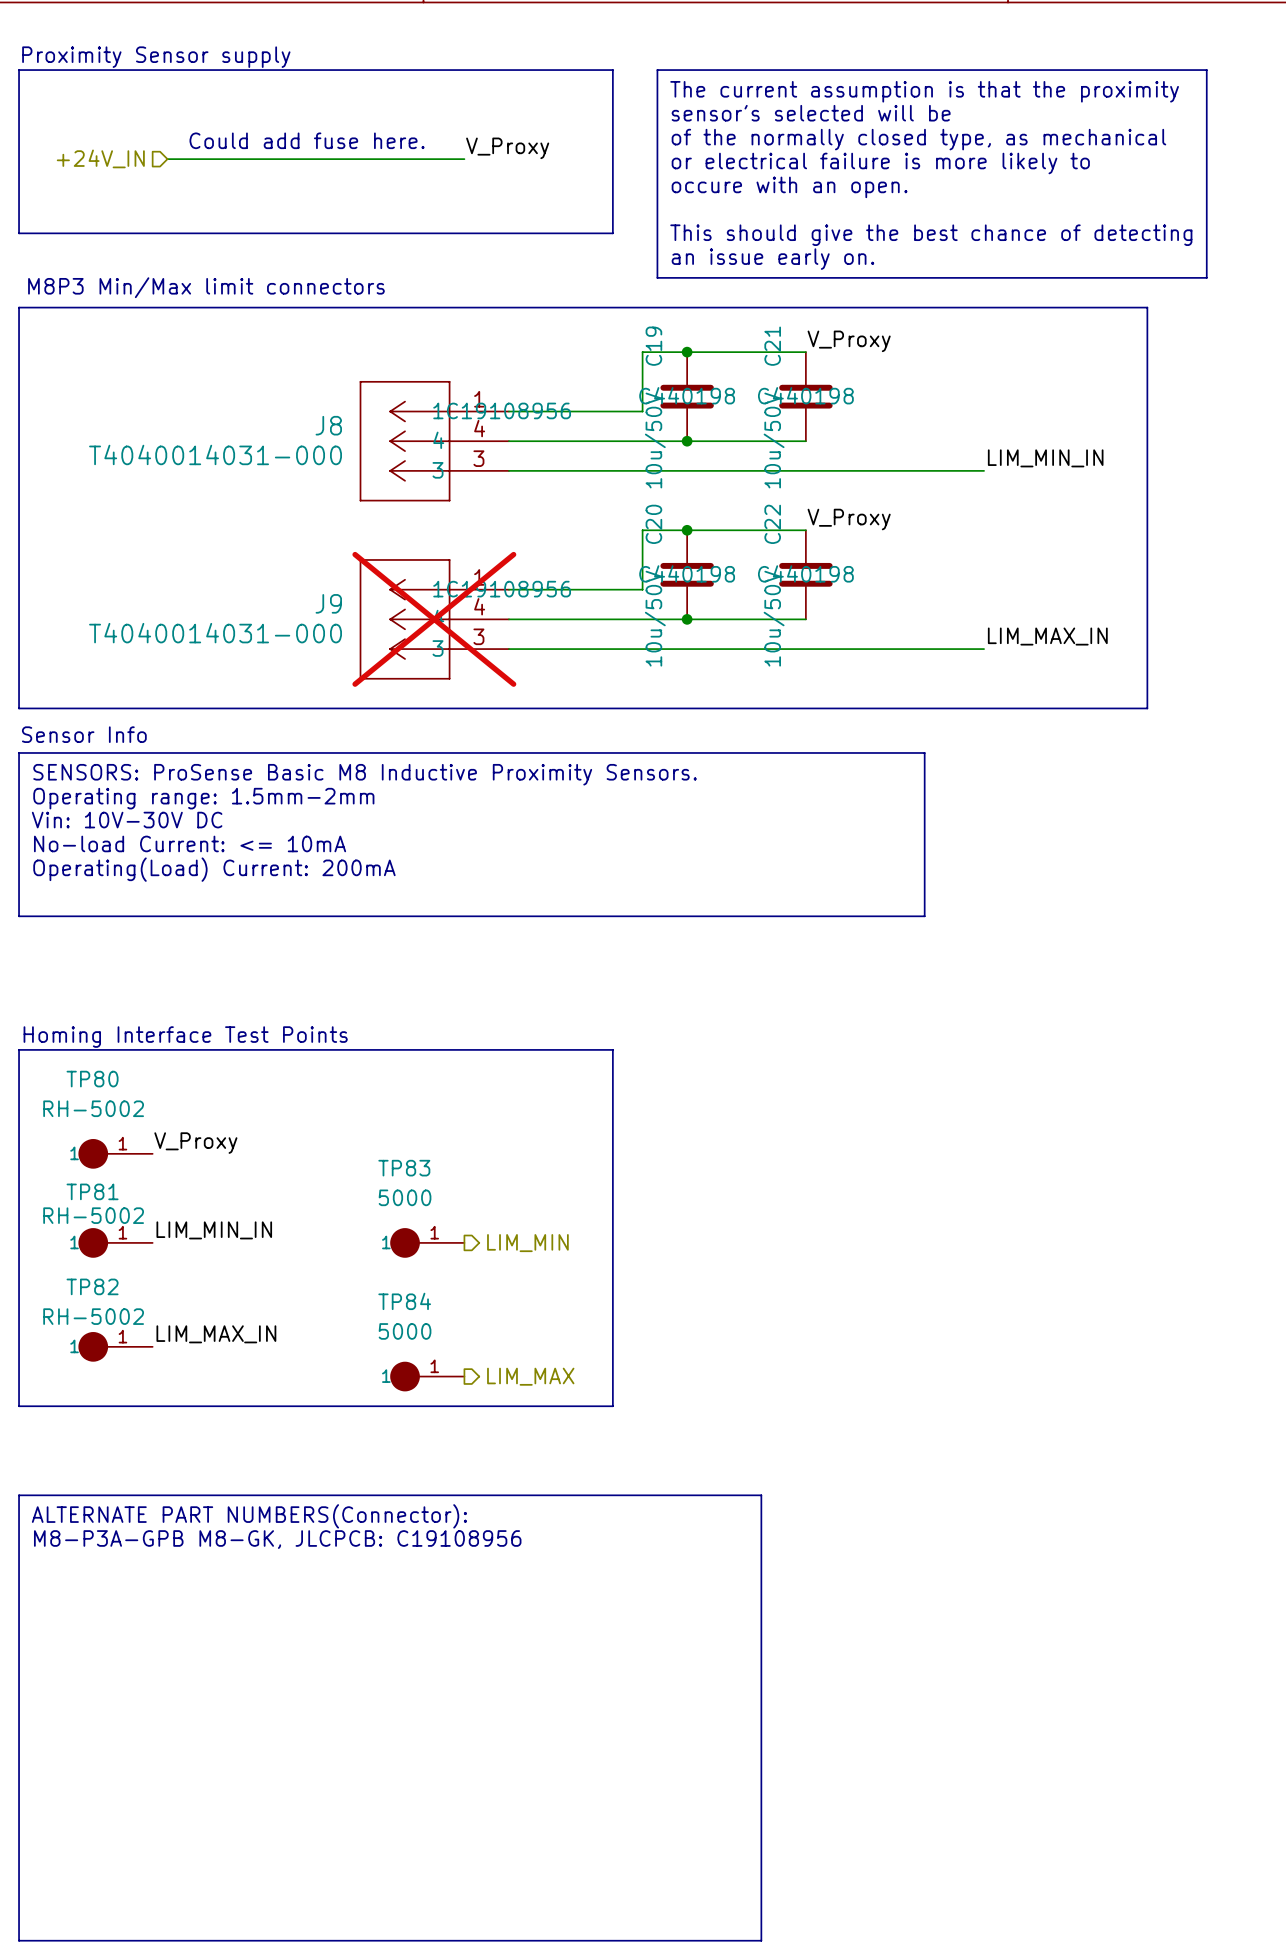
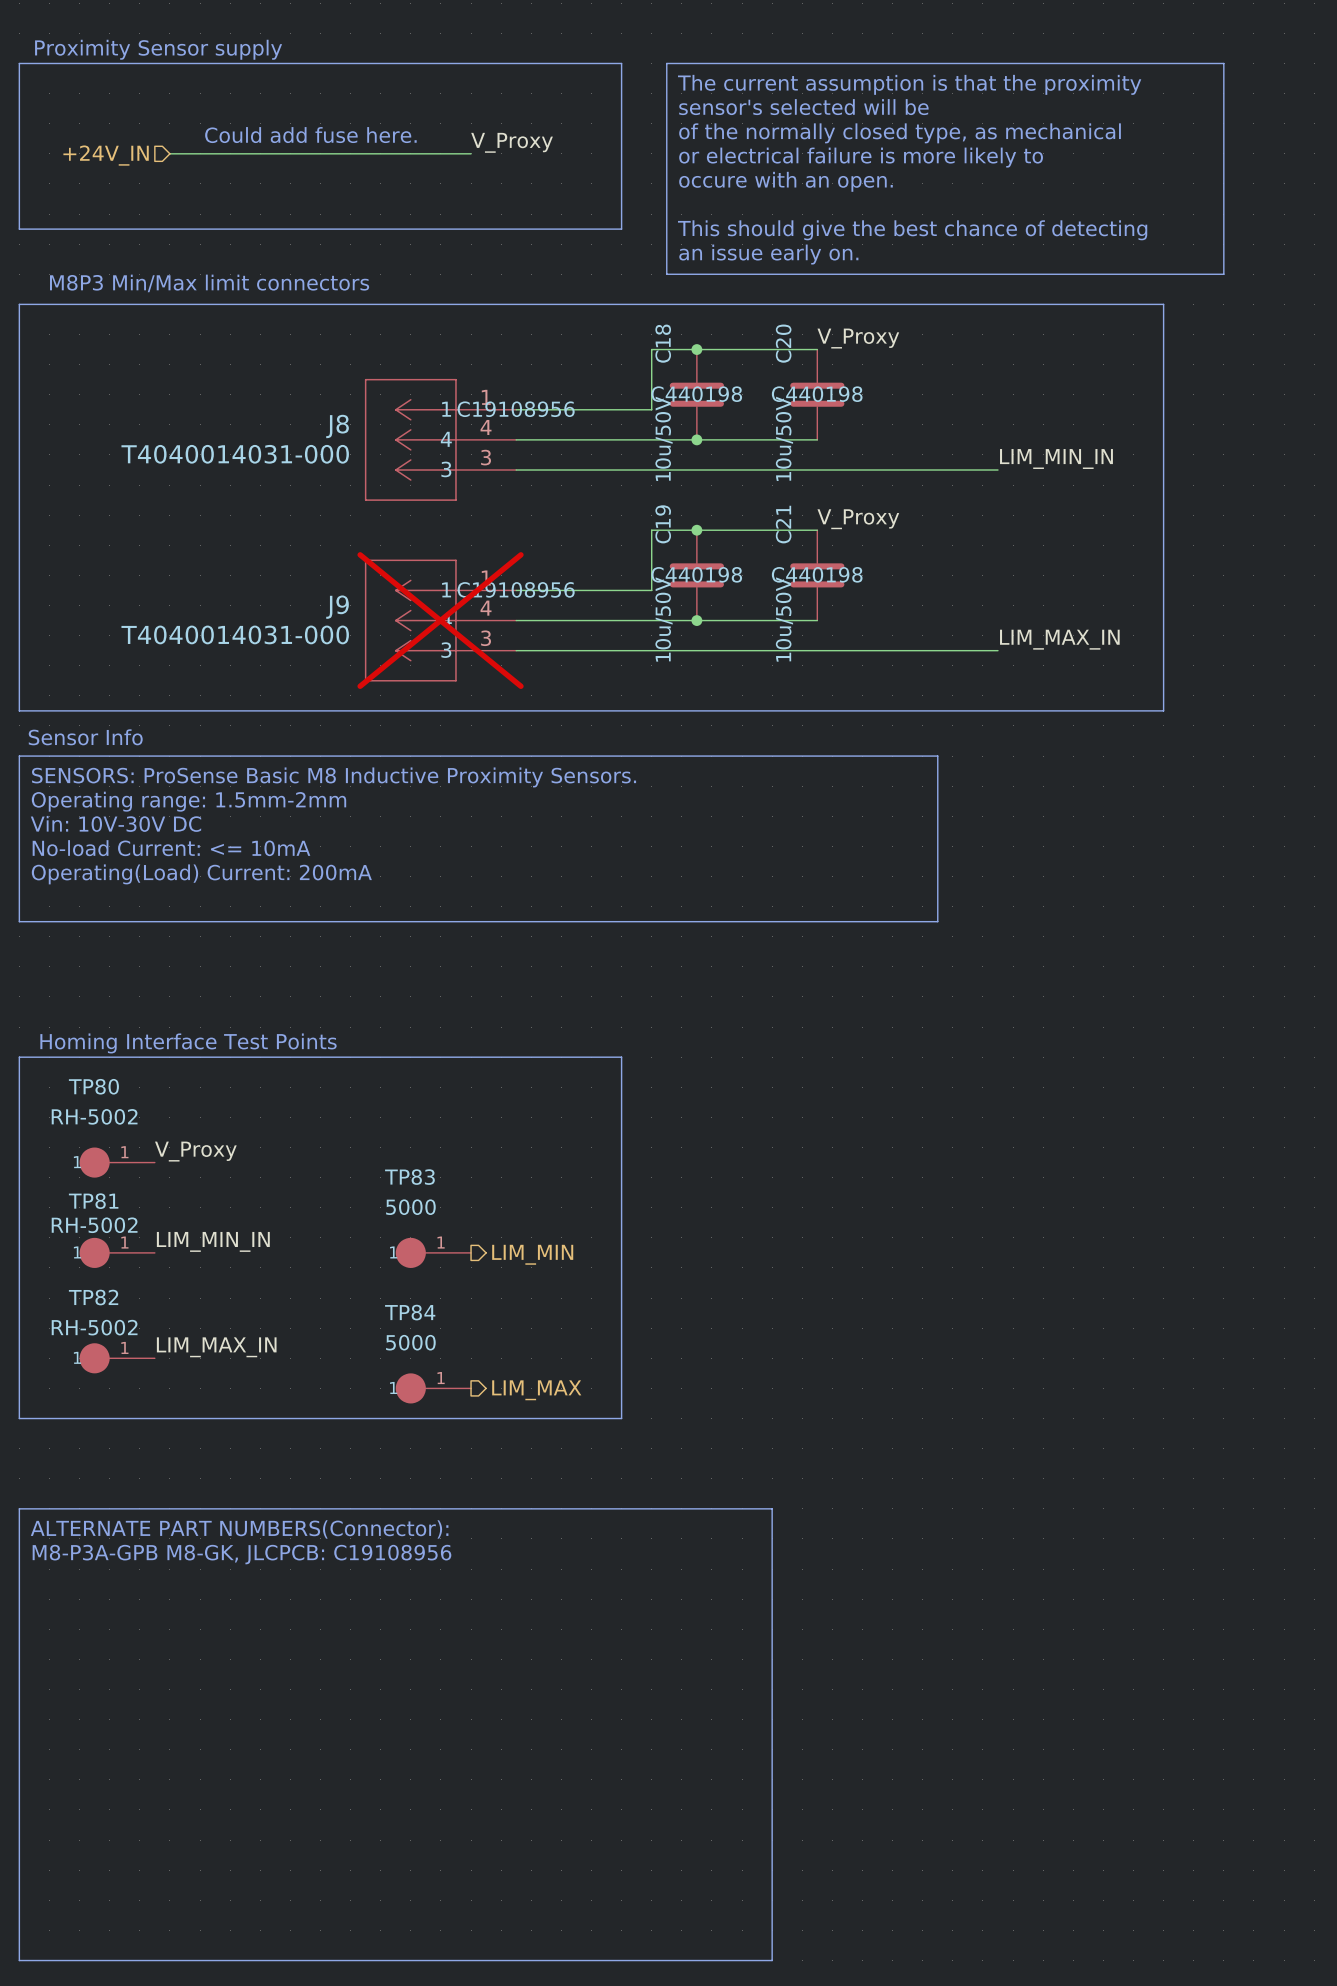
C19 name: C19 (653, 346) -> C18 (663, 343)
C21 name: C21 (772, 346) -> C20 (783, 343)
C20 name: C20 (653, 524) -> C19 (663, 524)
C22 name: C22 (772, 524) -> C21 (783, 524)

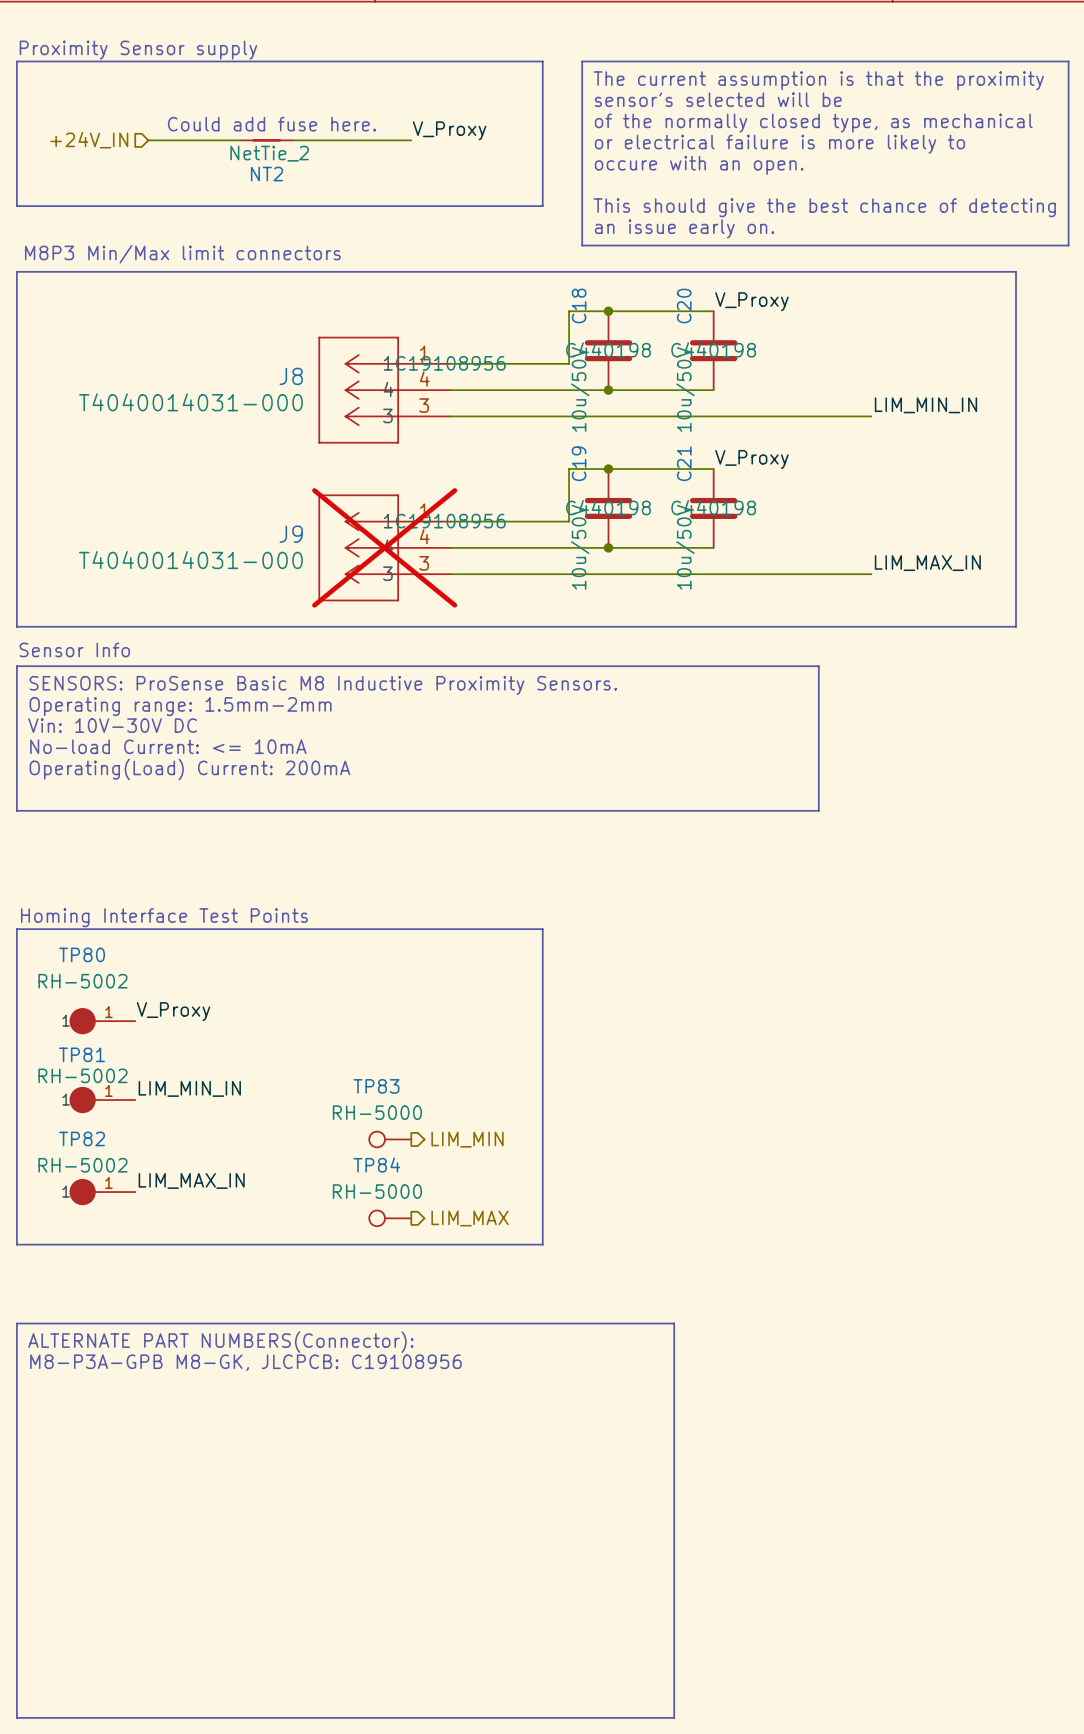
NT2: none -> NetTie_2 (266, 140)
TP83 value: 5000 (410, 1207) -> RH-5000 (377, 1112)
TP83 symbol: [395, 1237, 472, 1268] -> [369, 1131, 412, 1148]
hierarchical label position: LIM_MIN (532, 1254) -> LIM_MIN (467, 1139)
TP84 value: 5000 (410, 1342) -> RH-5000 (377, 1191)
TP84 symbol: [395, 1373, 472, 1404] -> [369, 1210, 412, 1227]

